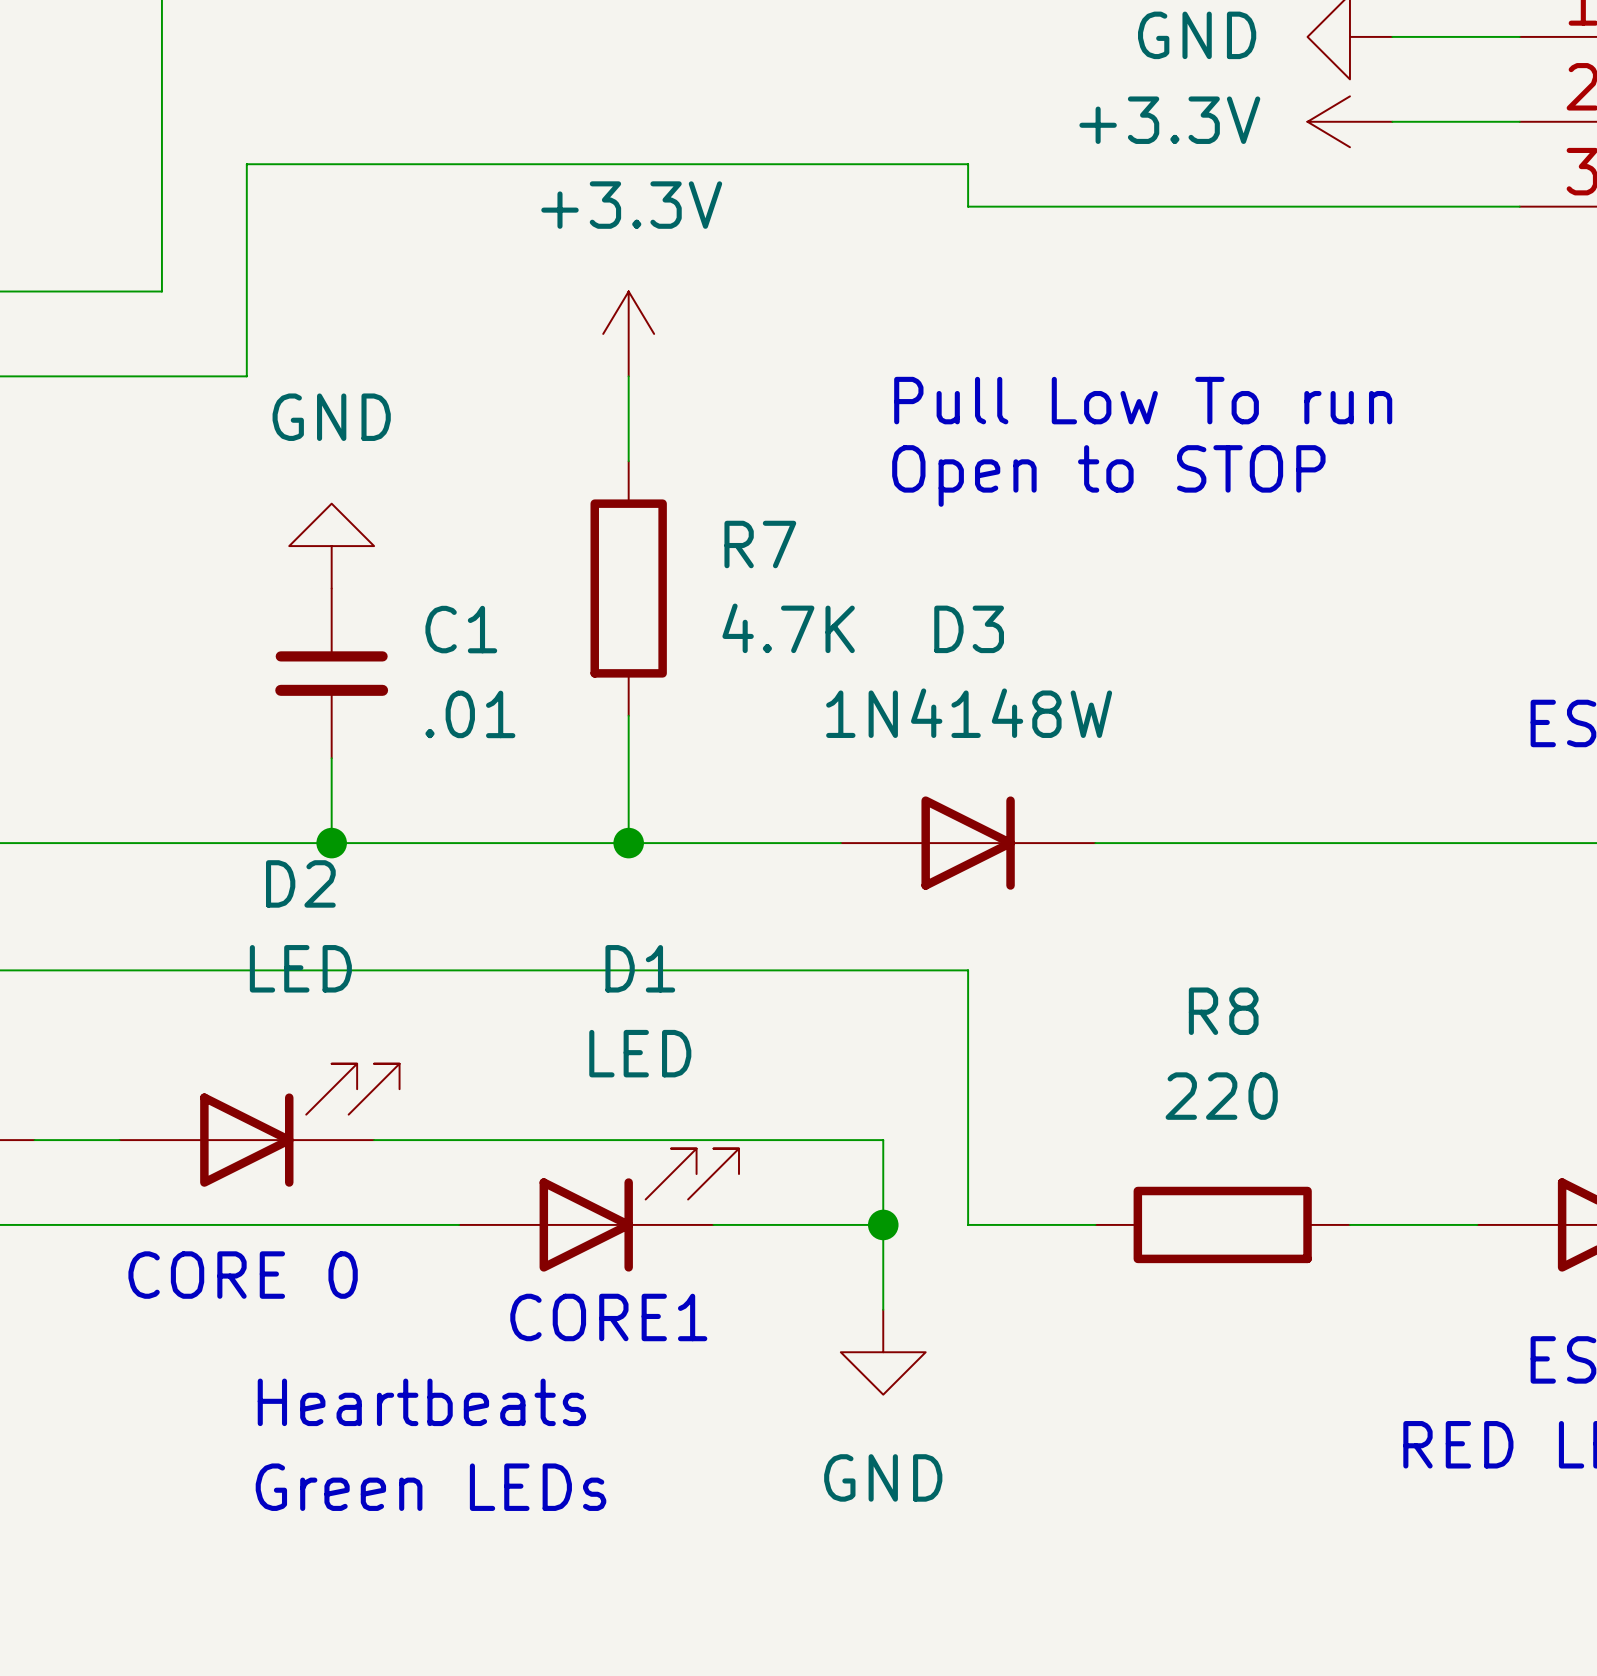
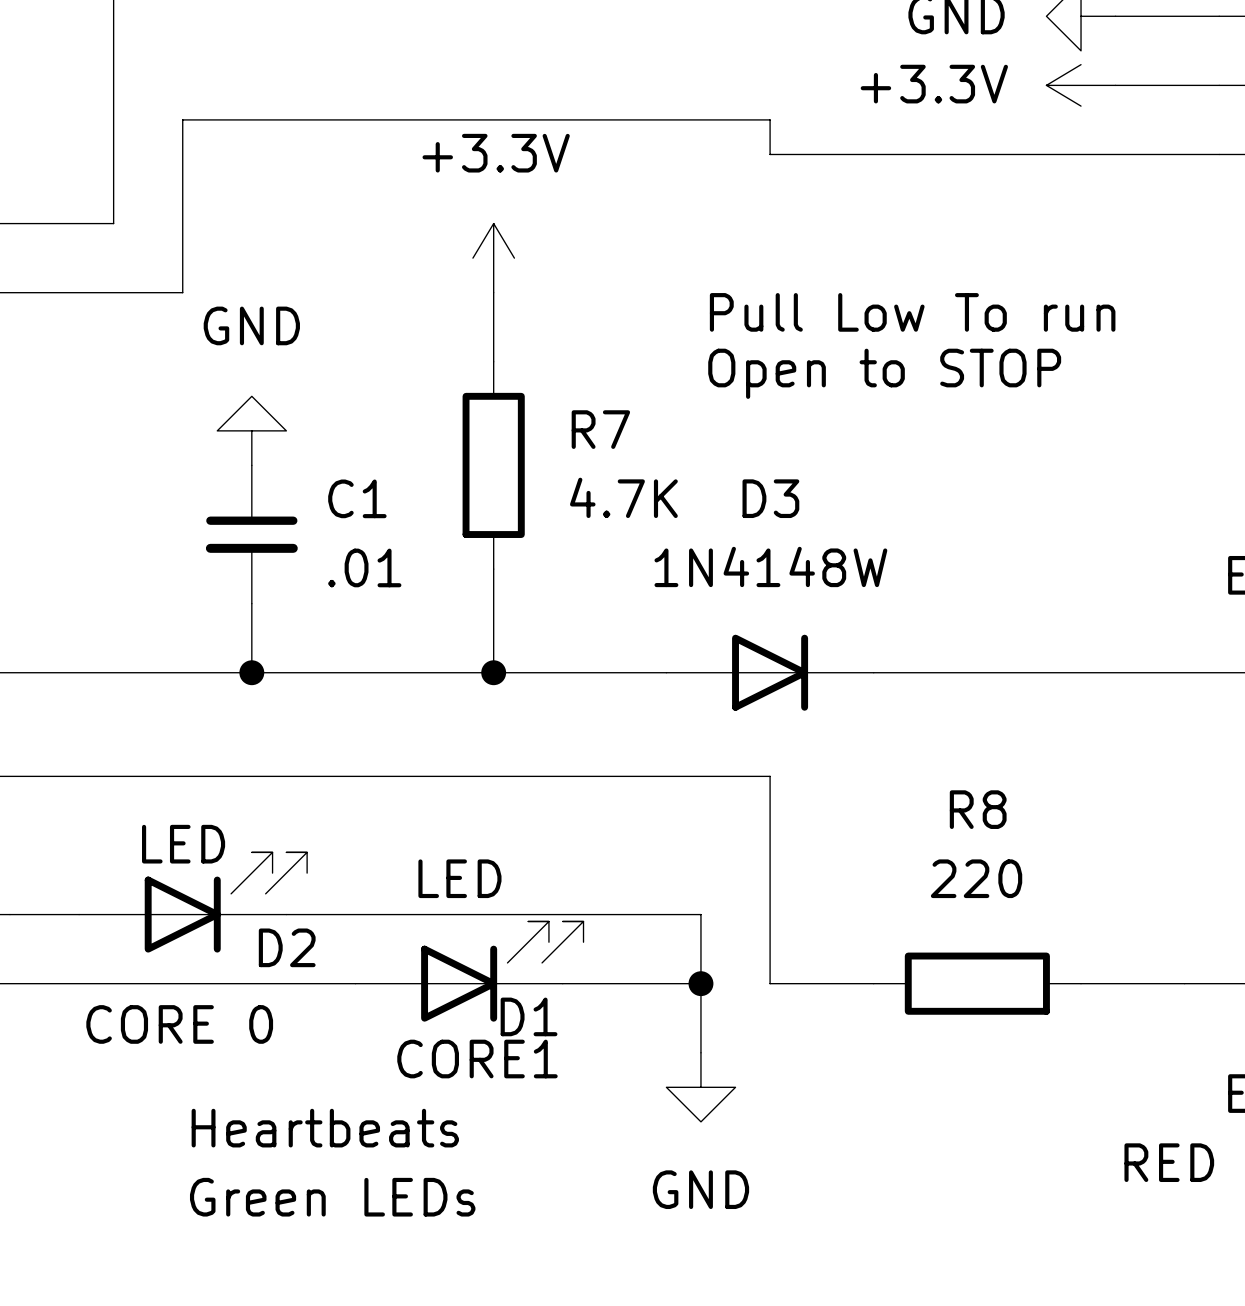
D2 name position: D2 (300, 883) -> D2 (287, 947)
D2 value position: LED (300, 968) -> LED (183, 844)
D1 name position: D1 (640, 968) -> D1 (529, 1016)
D1 value position: LED (640, 1053) -> LED (459, 878)

